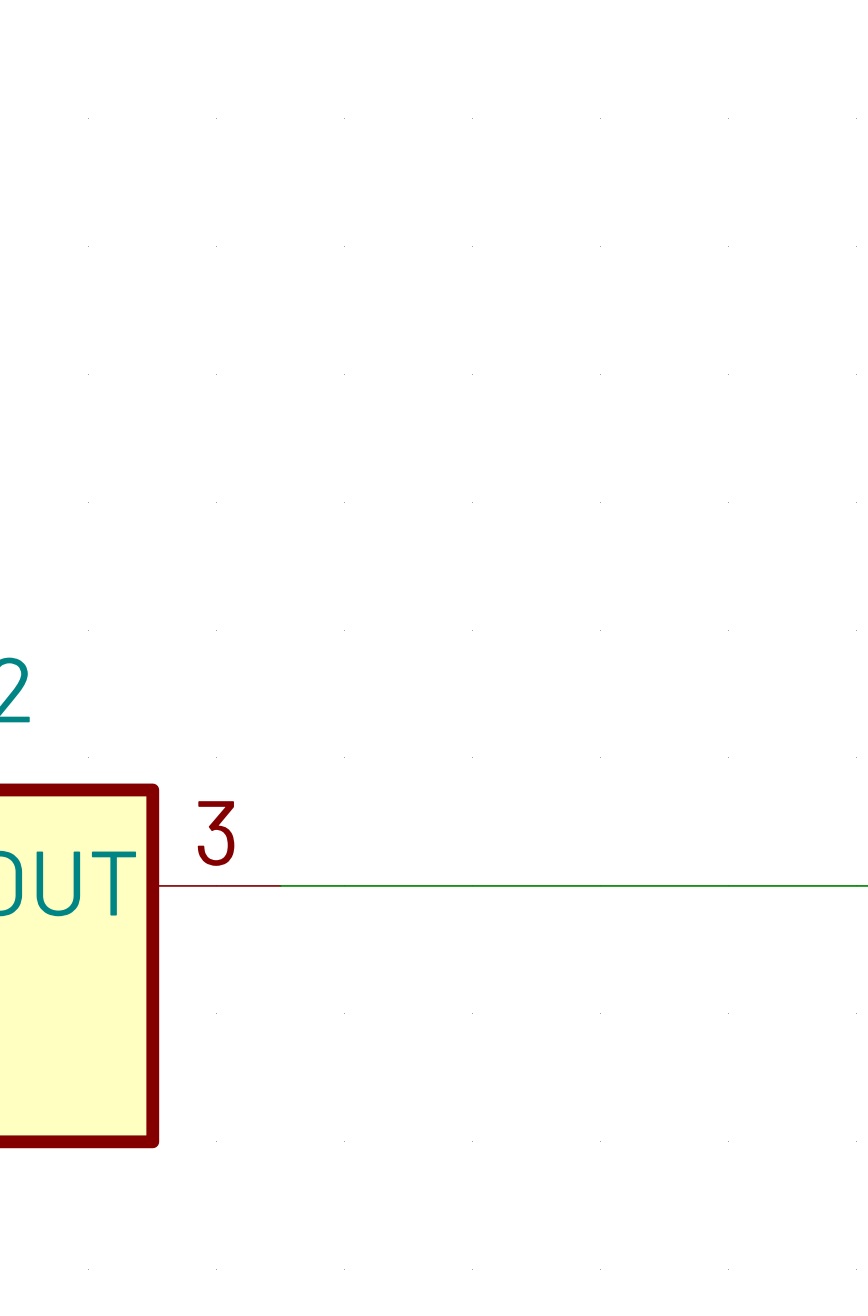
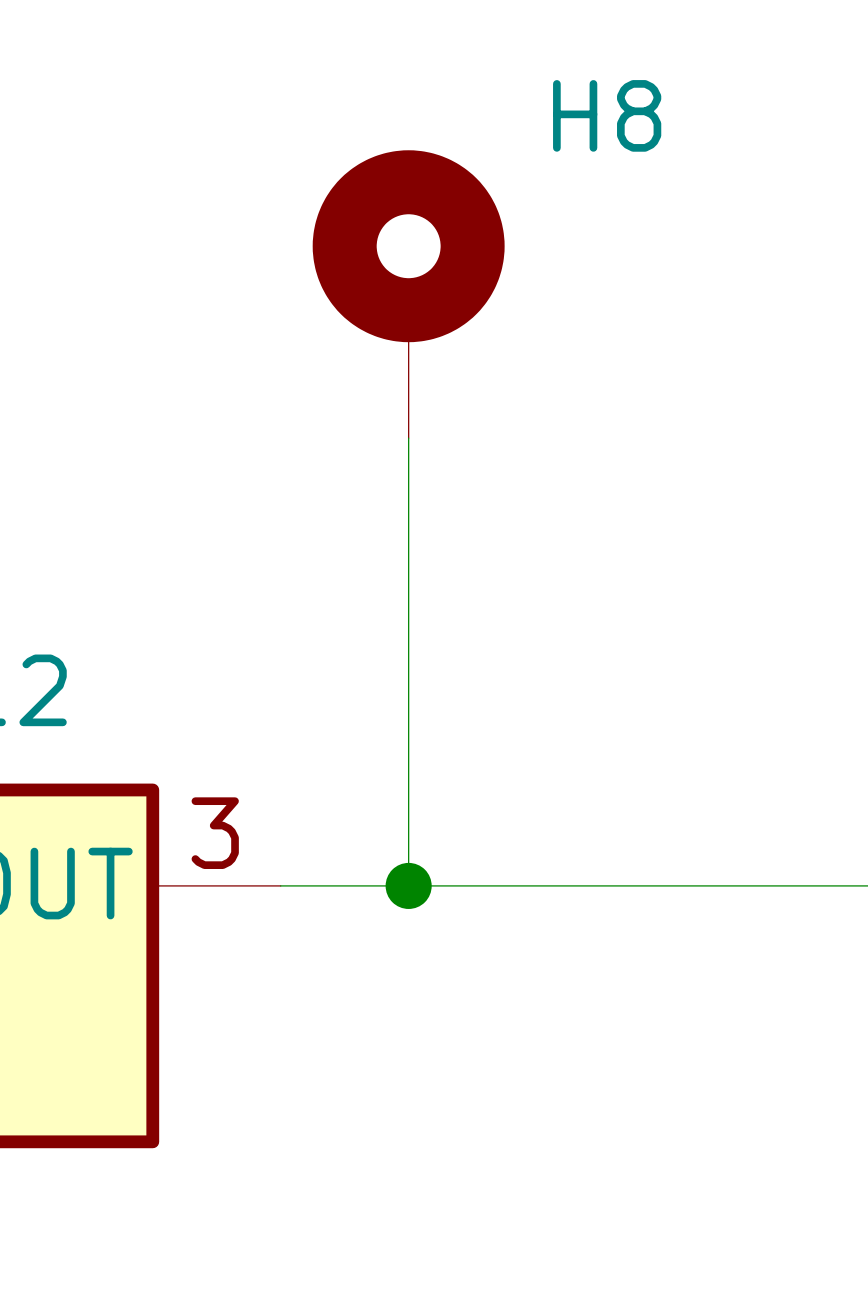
H8: none -> (408, 294)
wire: none -> (408, 438) (408, 885)
junction: none -> (408, 885)

